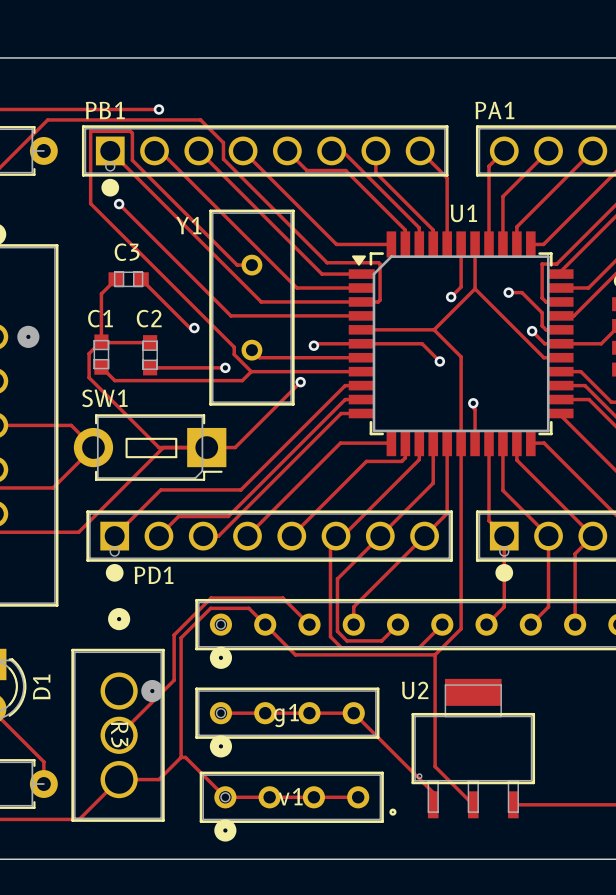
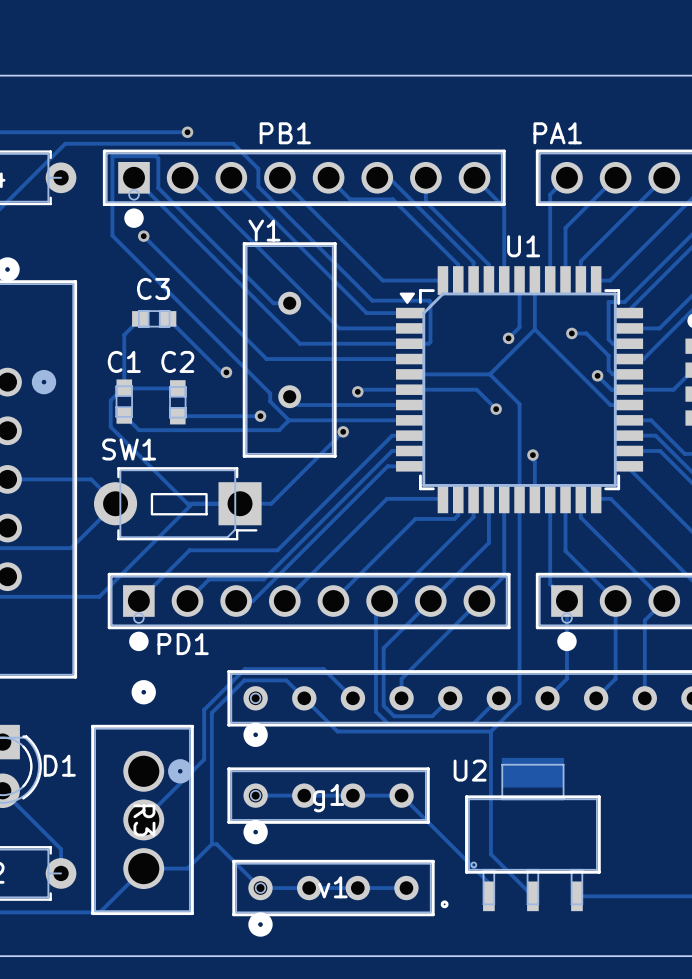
PB1 name position: PB1 (105, 110) -> PB1 (285, 133)
Y1 name position: Y1 (188, 225) -> Y1 (264, 230)
D1 name rotation: 0° (41, 687) -> 90° clockwise (59, 765)

